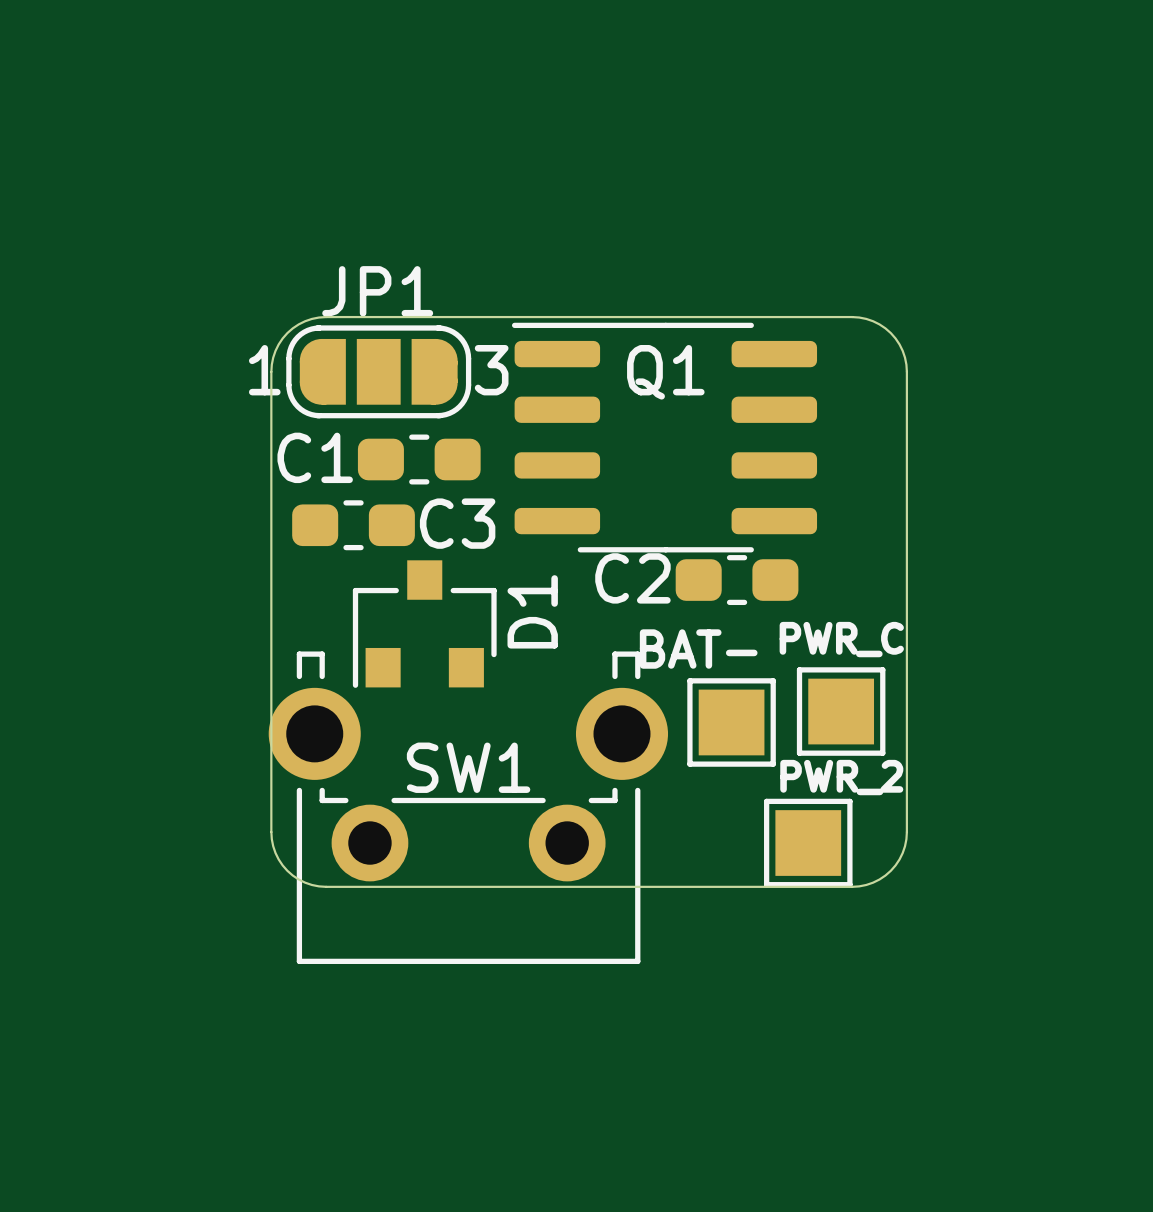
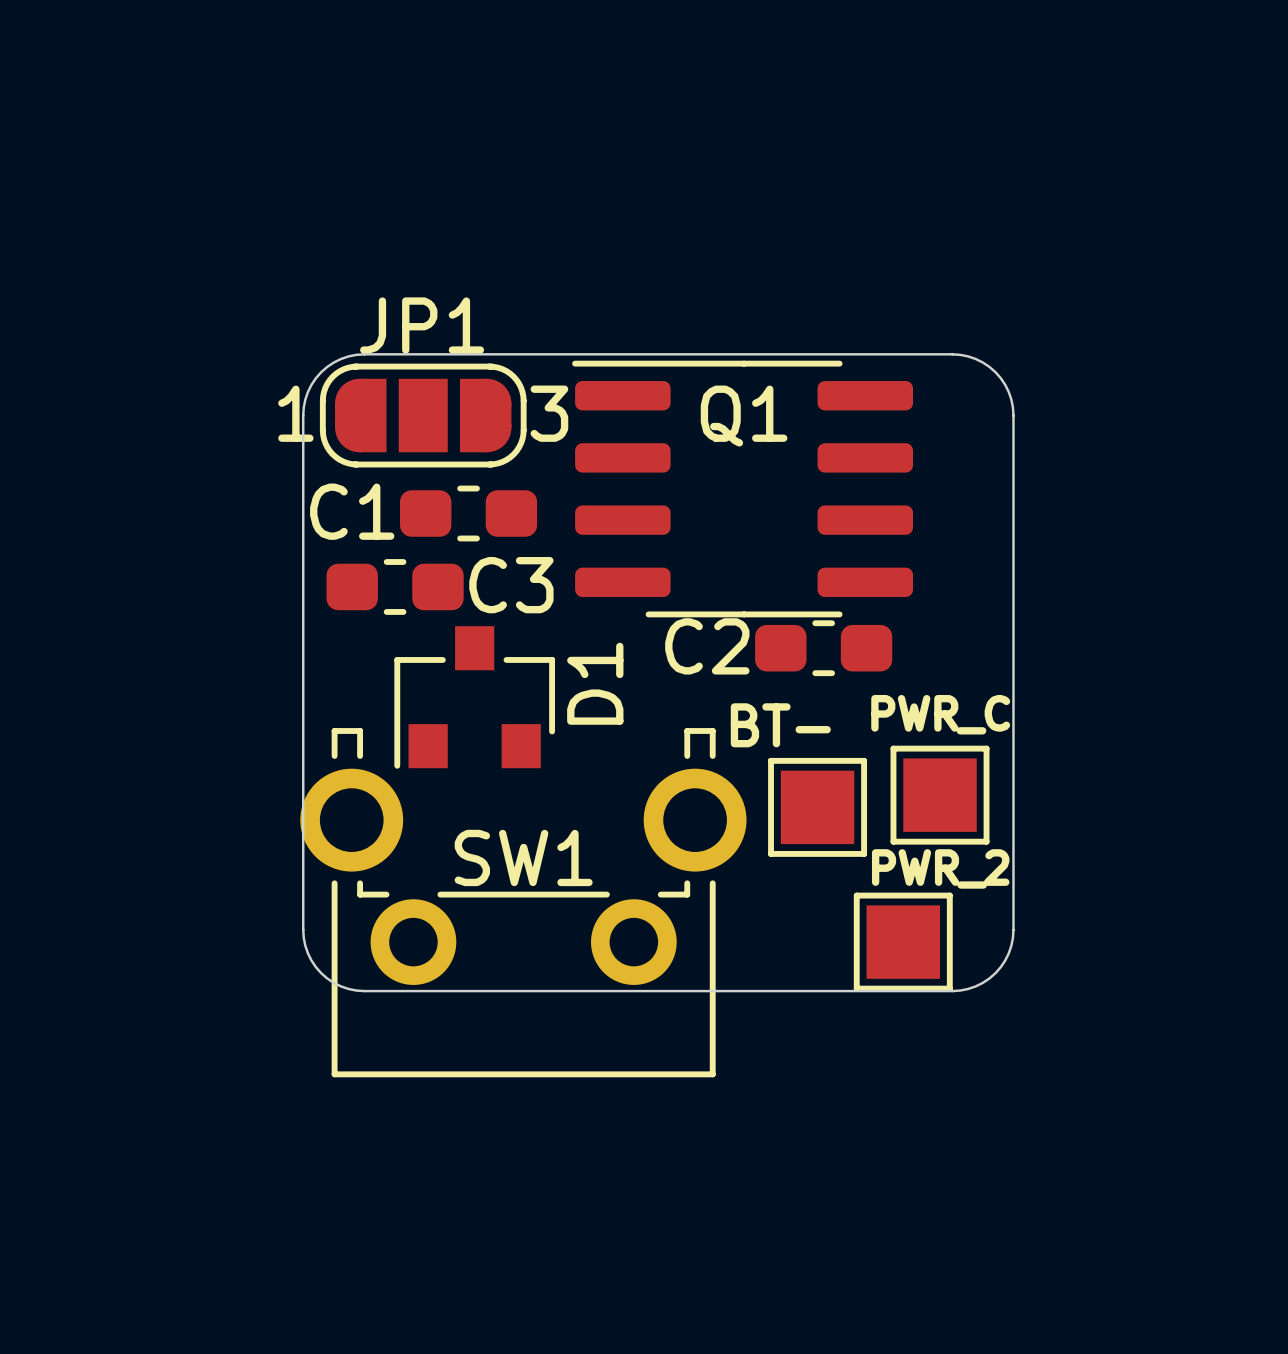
BAT- name: BAT- (698, 649) -> BT- (780, 725)

